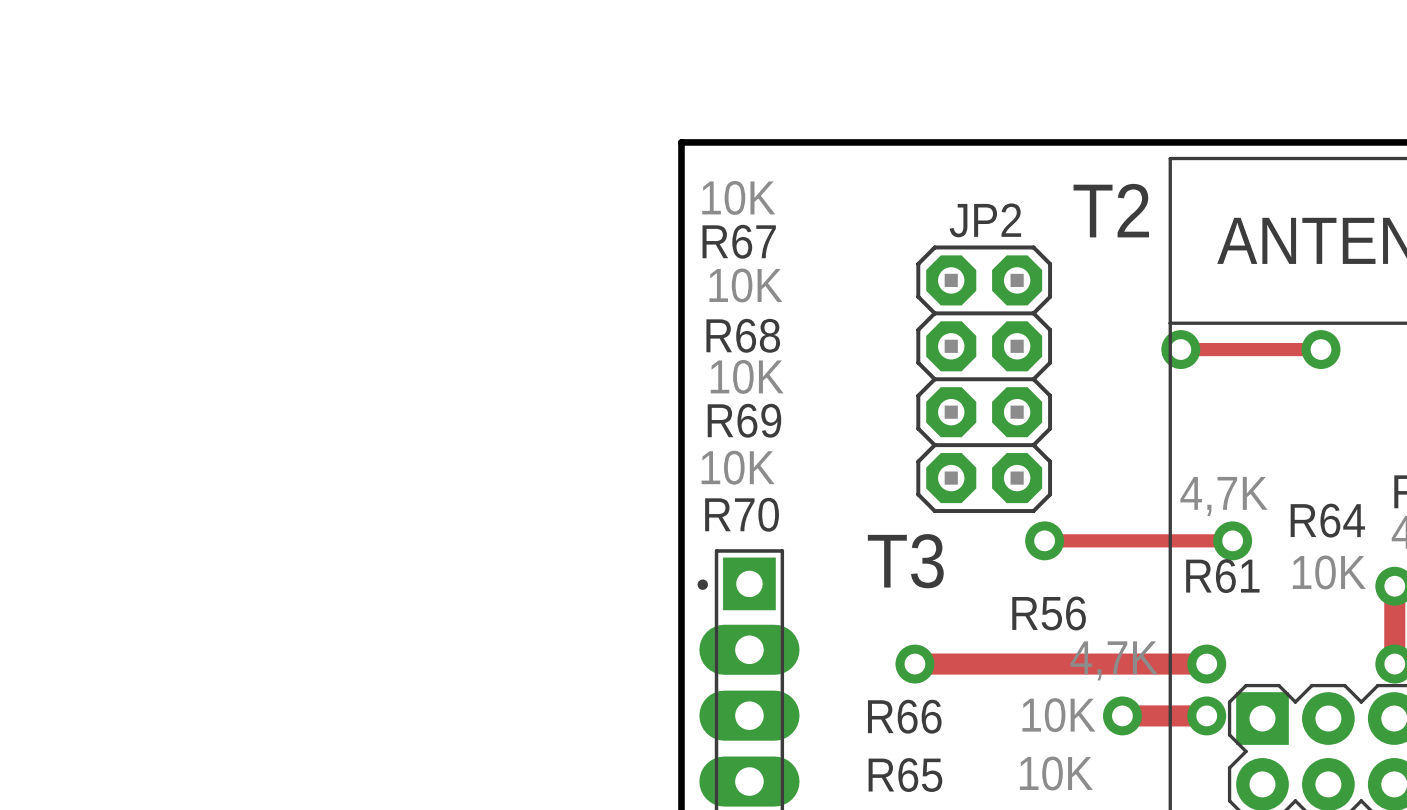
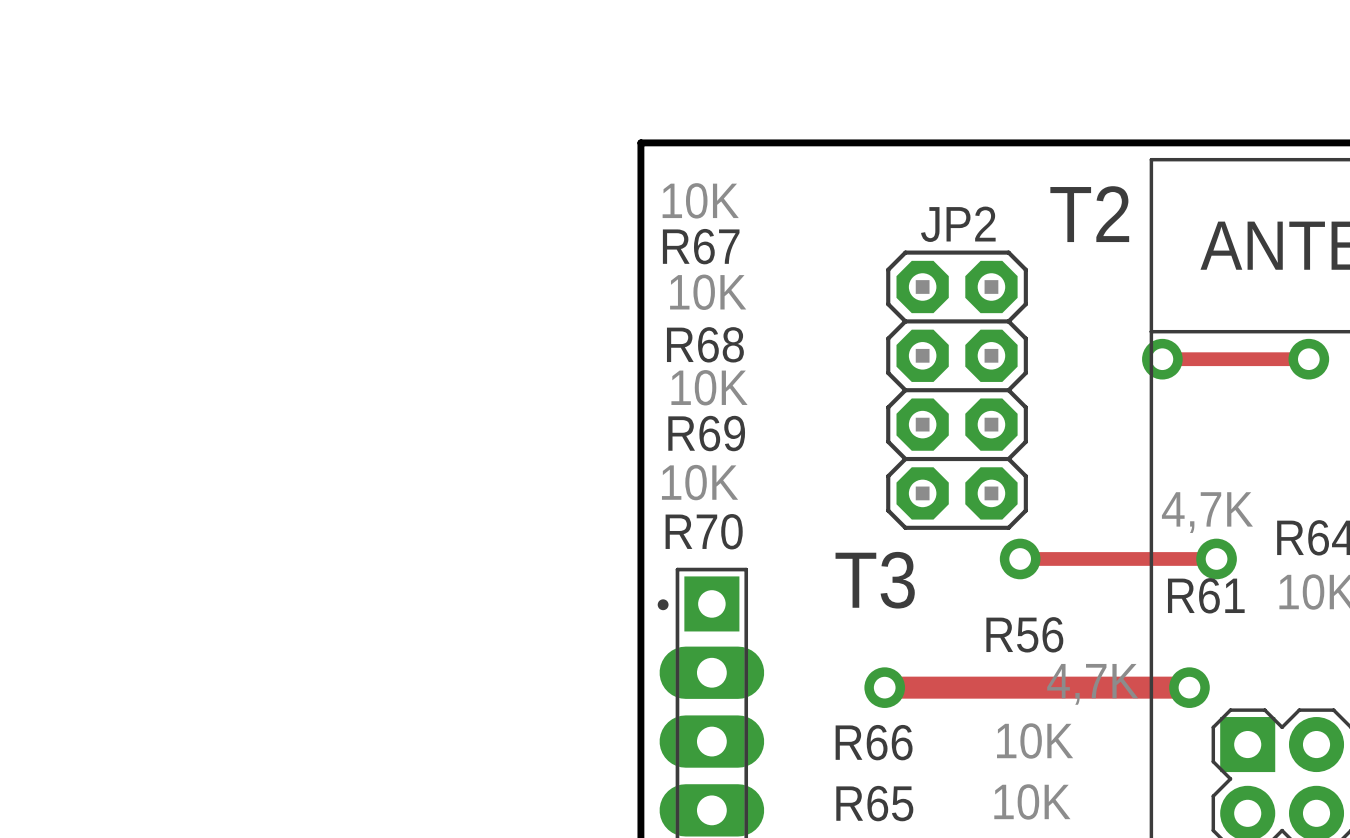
track: (1122, 715) (1206, 715) -> none
via: (1122, 715) -> none
via: (1206, 715) -> none

